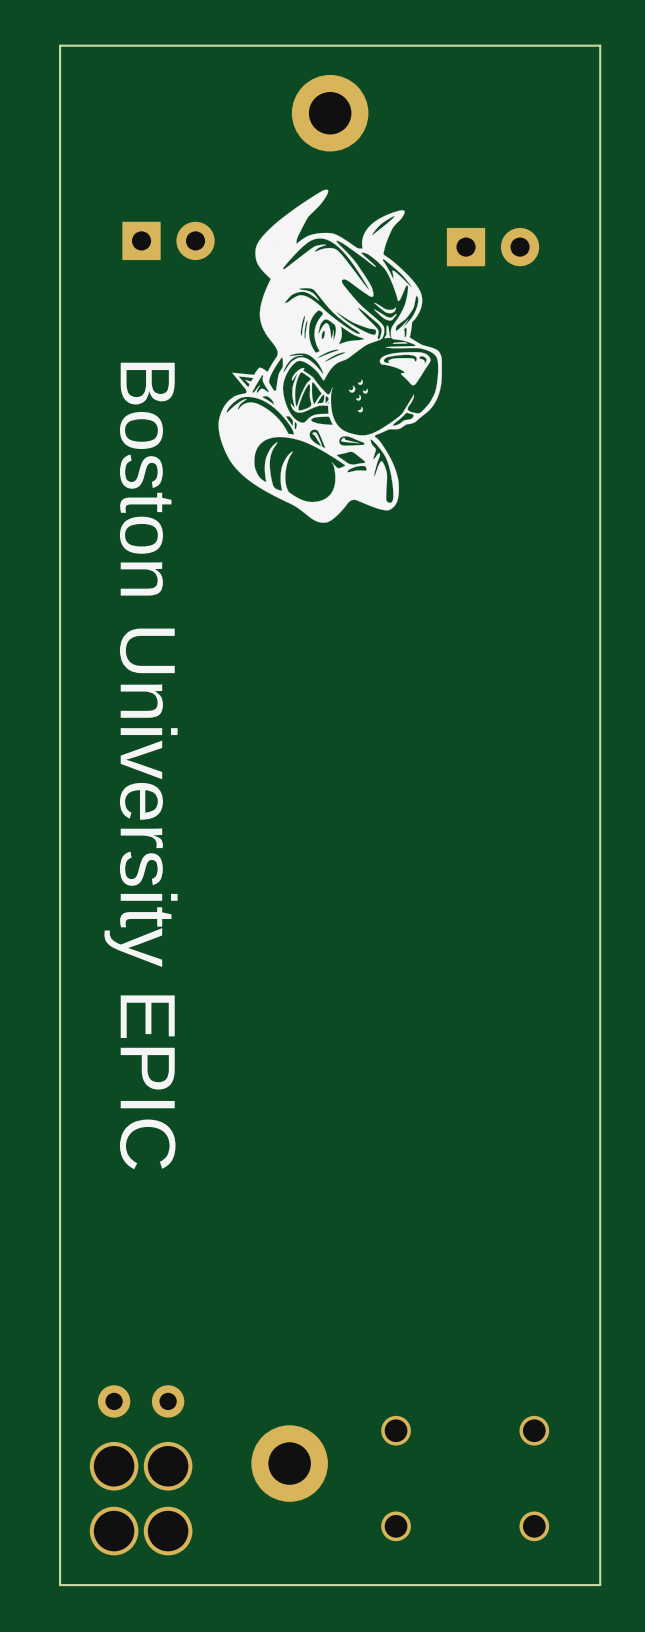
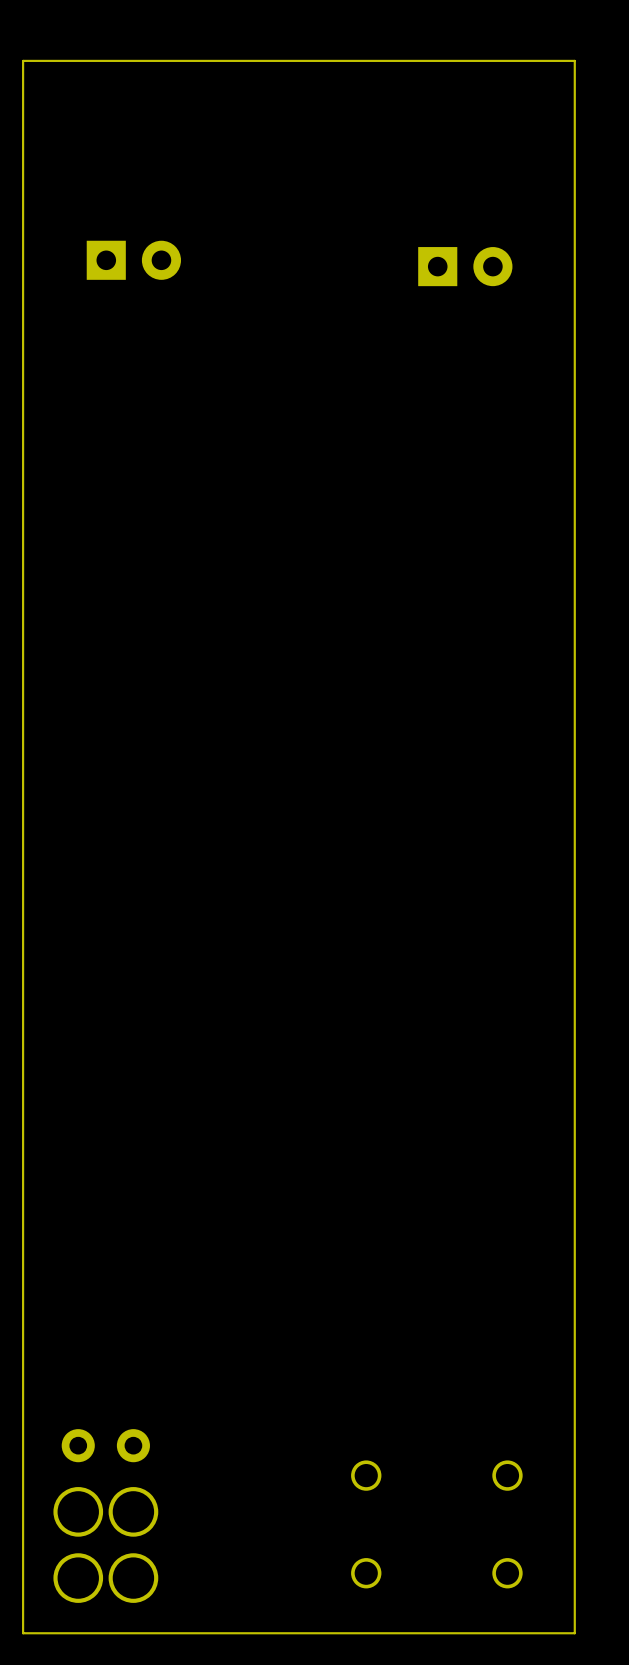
part: (330, 113) -> none
drawing: [218, 189, 442, 523] -> none
text: Boston University EPIC (141, 765) -> none
part: (289, 1463) -> none

